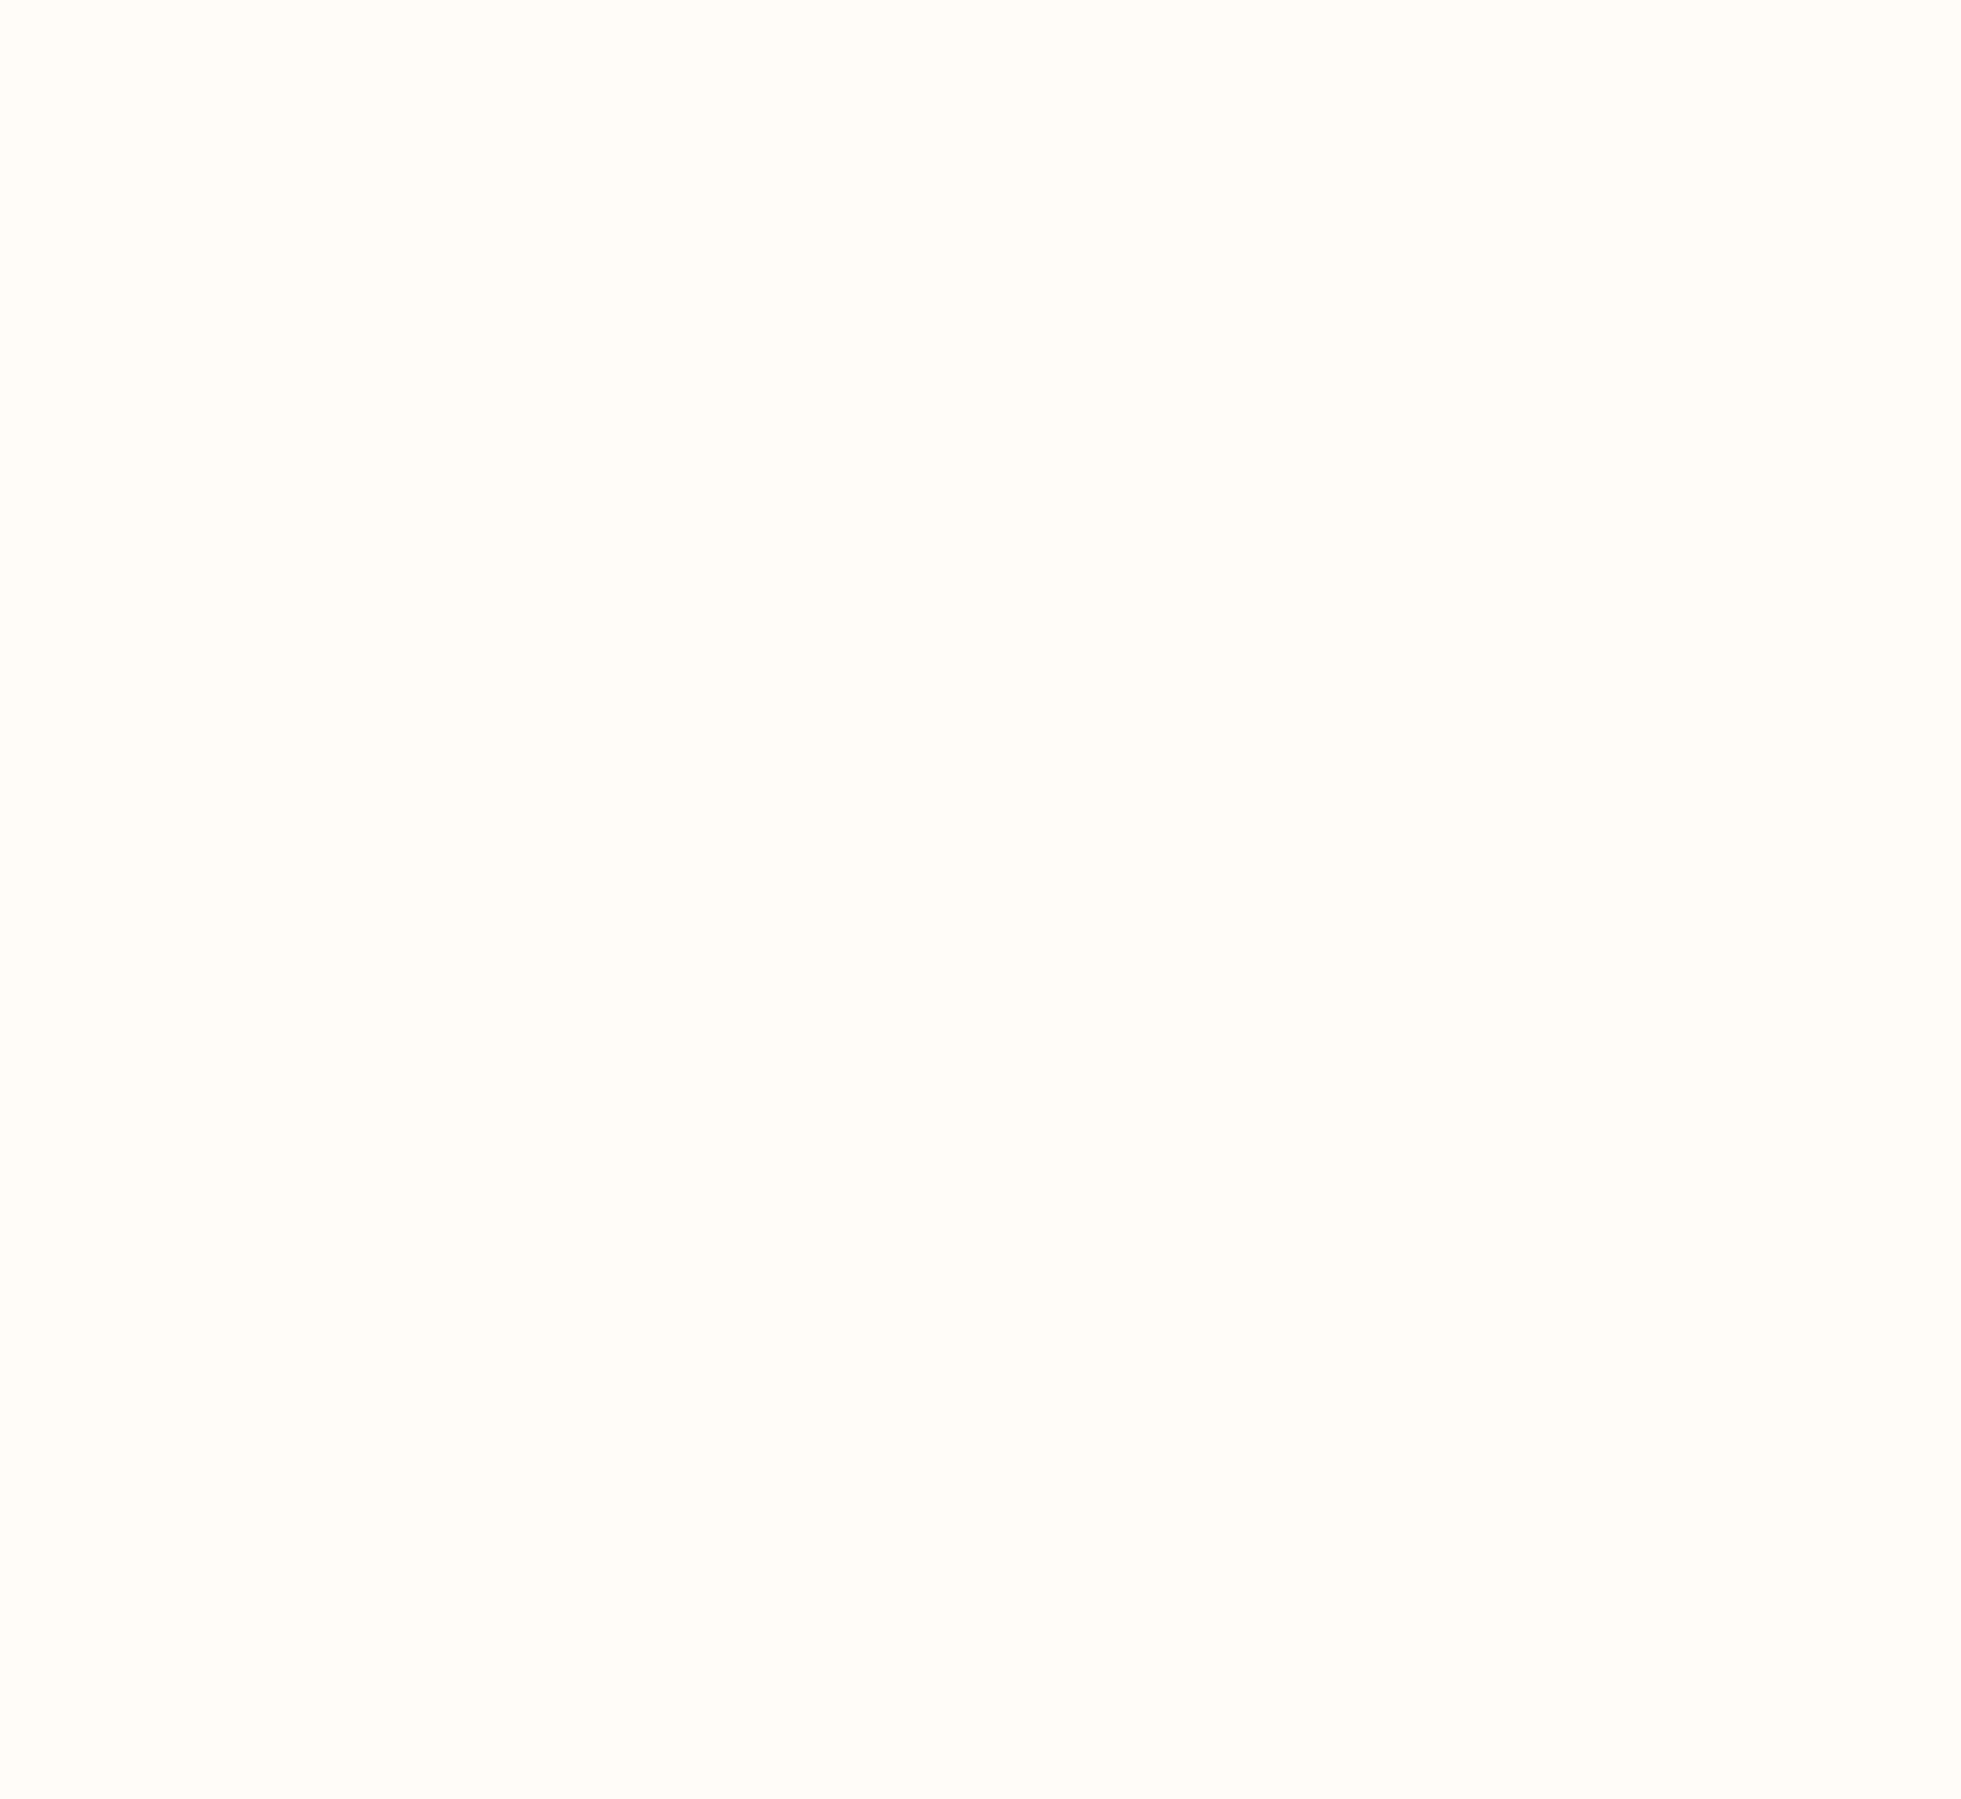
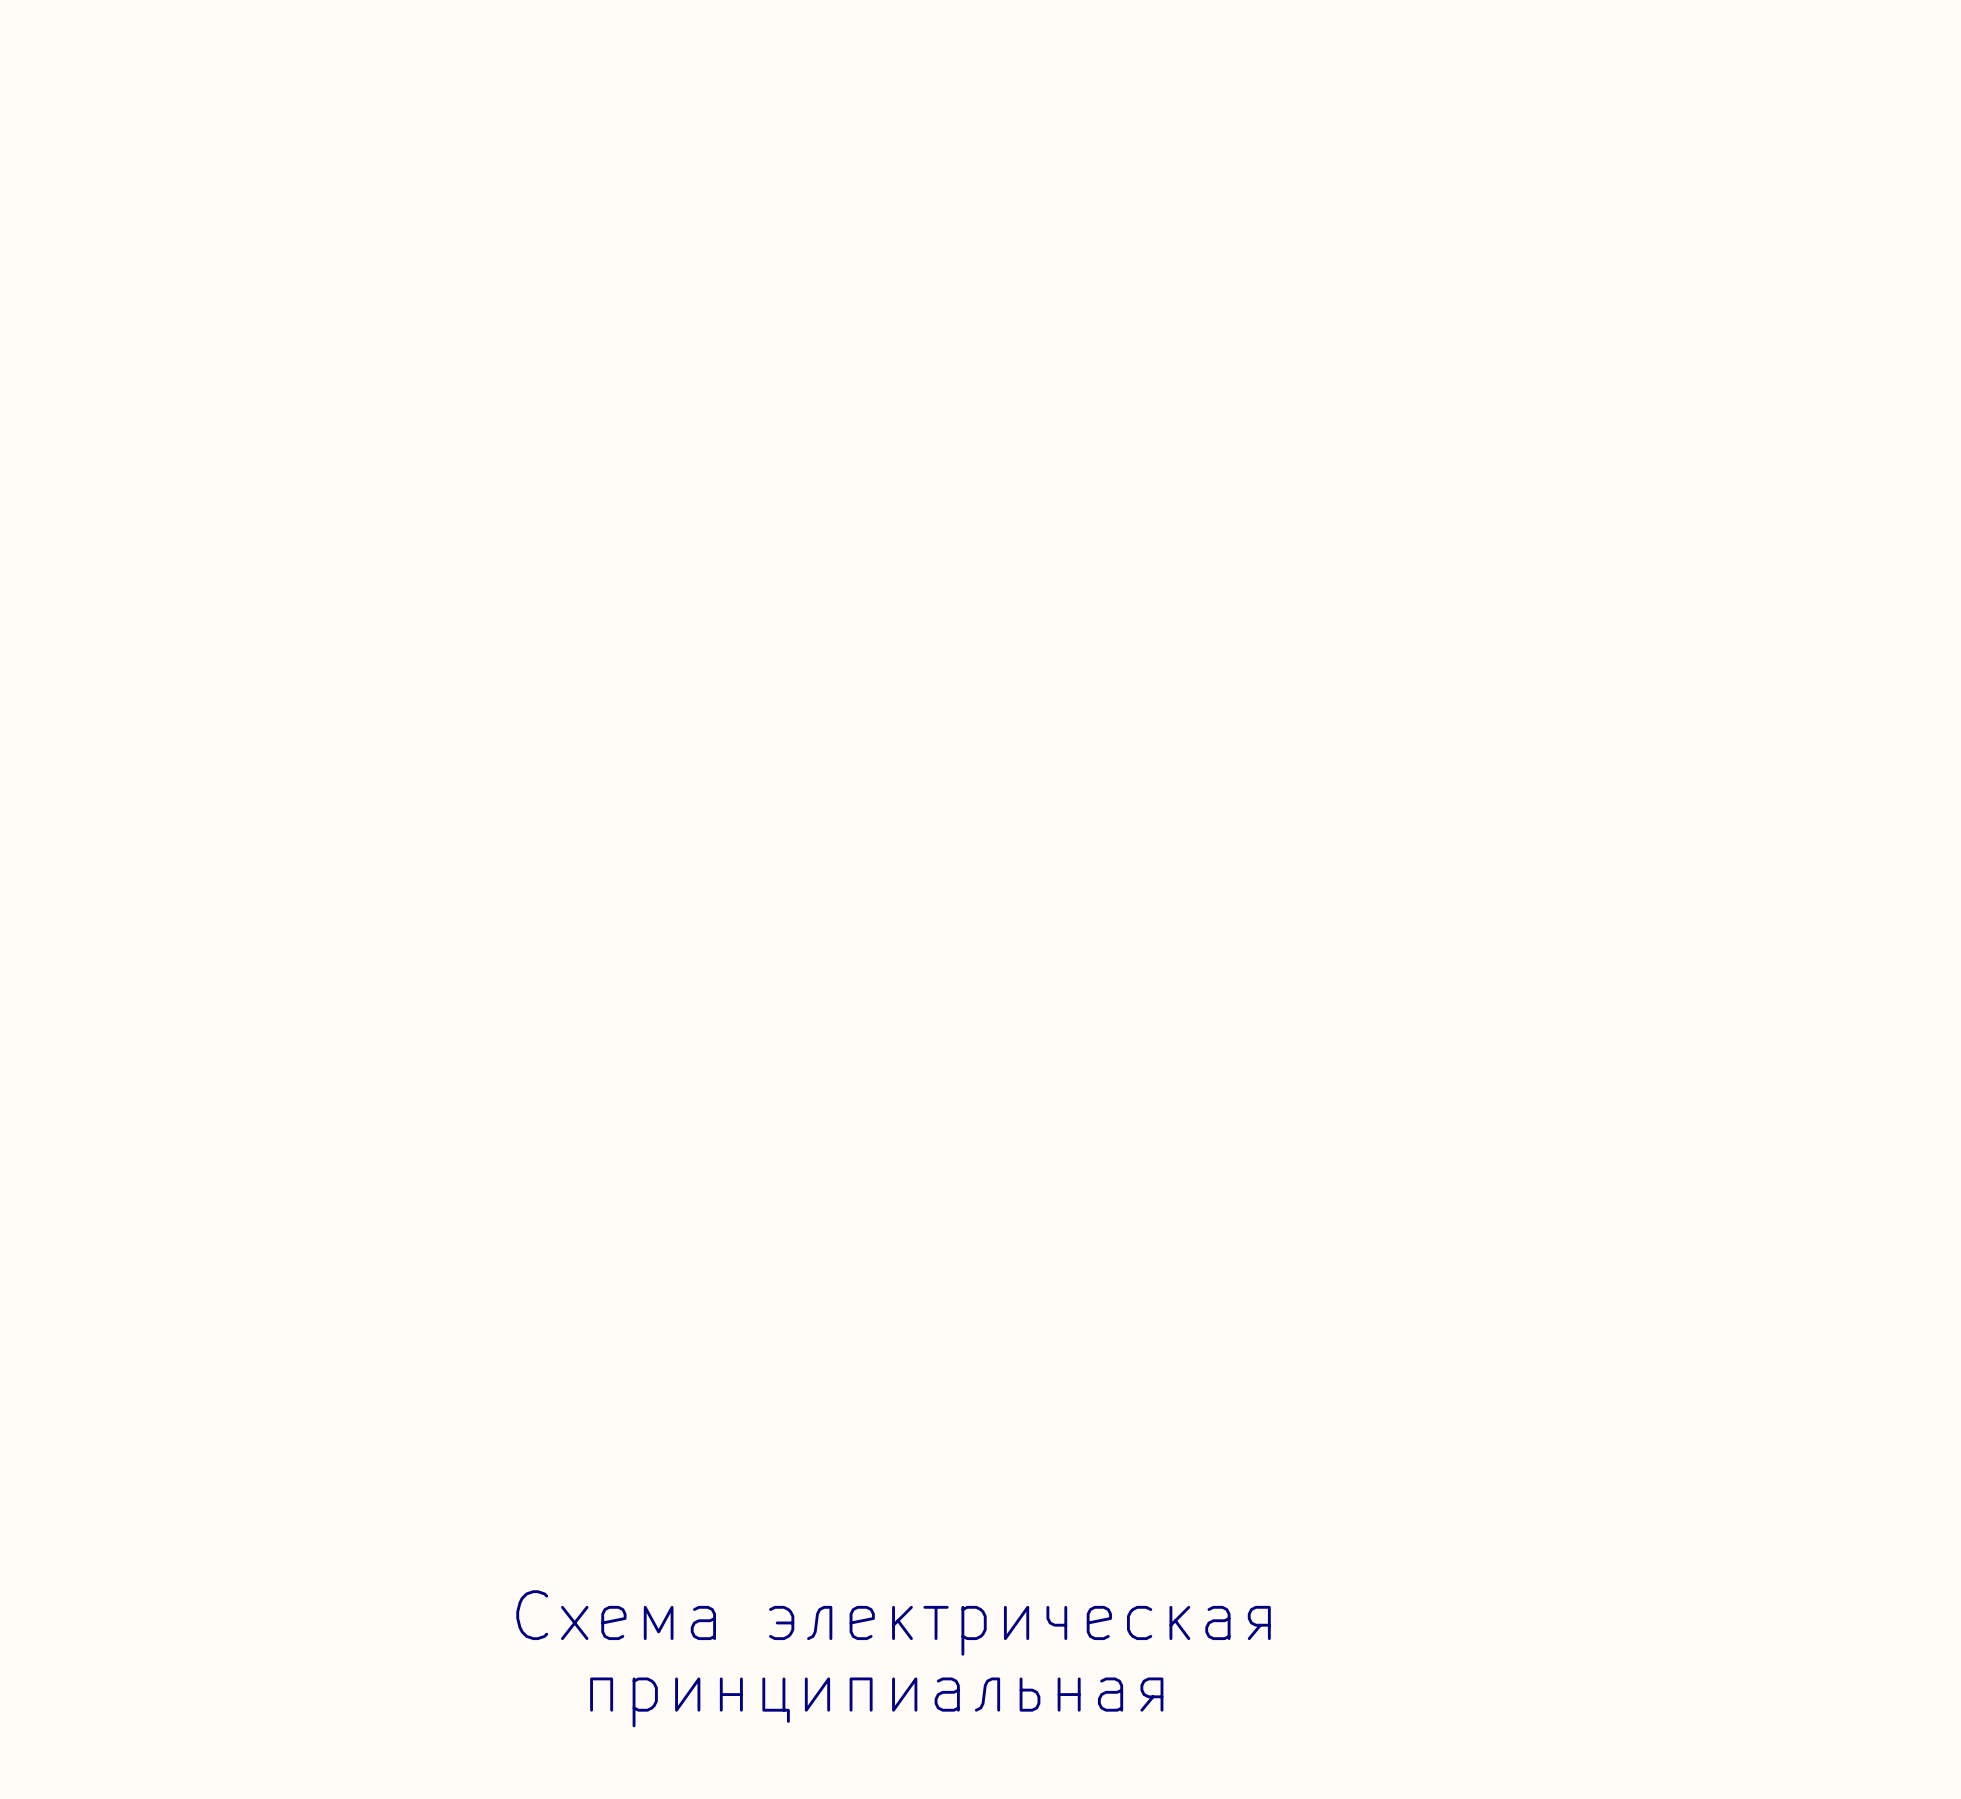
text: none -> Схема электрическая (893, 1622)
text: none -> принципиальная (876, 1702)

